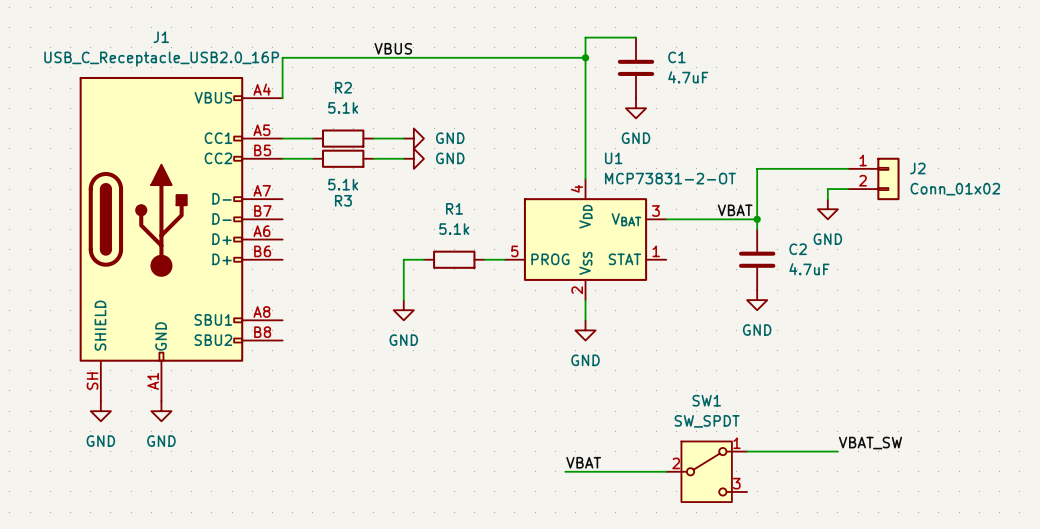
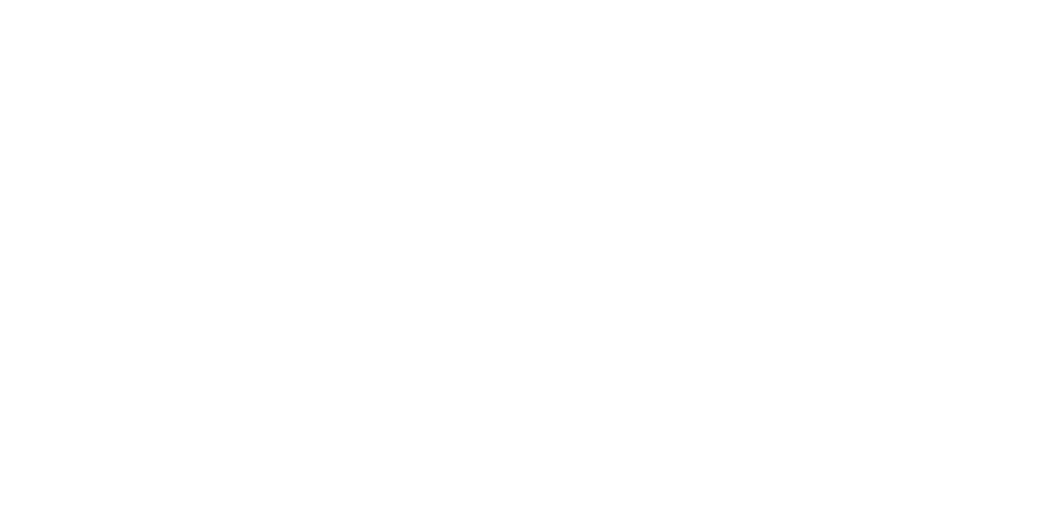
wire: (636, 37) (585, 37) (585, 178) -> none
label: VBUS (393, 48) -> none
wire: (585, 57) (282, 57) (282, 98) -> none
junction: (585, 57) -> none
C1: 4.7uF (636, 67) -> none
power symbol: GND (636, 108) -> none
wire: (282, 138) (312, 138) -> none
R2: 5.1k (343, 138) -> none
wire: (373, 138) (403, 138) -> none
power symbol: GND (413, 138) -> none
wire: (282, 158) (312, 158) -> none
R3: 5.1k (343, 158) -> none
wire: (373, 158) (403, 158) -> none
power symbol: GND (413, 158) -> none
wire: (848, 168) (757, 168) (757, 229) -> none
J2: Conn_01x02 (873, 178) -> none
wire: (848, 189) (827, 189) (827, 199) -> none
power symbol: GND (827, 209) -> none
label: VBAT (735, 210) -> none
wire: (666, 219) (757, 219) -> none
junction: (757, 219) -> none
J1: USB_C_Receptacle_USB2.0_16P (181, 239) -> none
U1: MCP73831-2-OT (585, 239) -> none
wire: (423, 259) (403, 259) (403, 300) -> none
R1: 5.1k (454, 259) -> none
wire: (484, 259) (504, 259) -> none
C2: 4.7uF (757, 259) -> none
wire: (585, 300) (585, 320) -> none
power symbol: GND (757, 300) -> none
power symbol: GND (403, 310) -> none
power symbol: GND (585, 330) -> none
power symbol: GND (100, 411) -> none
power symbol: GND (161, 411) -> none
label: VBAT_SW (870, 443) -> none
wire: (747, 451) (837, 451) -> none
label: VBAT (583, 462) -> none
wire: (565, 471) (666, 471) -> none
SW1: SW_SPDT (706, 471) -> none

